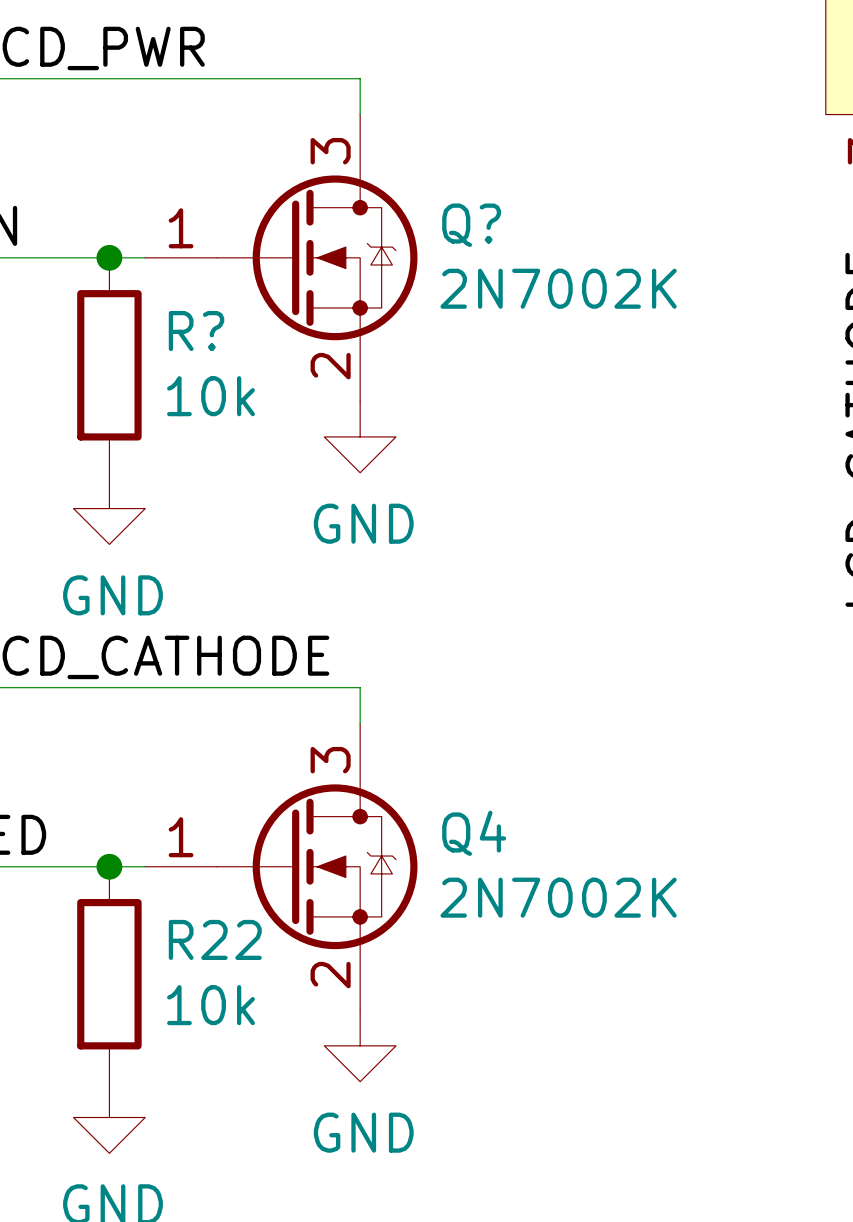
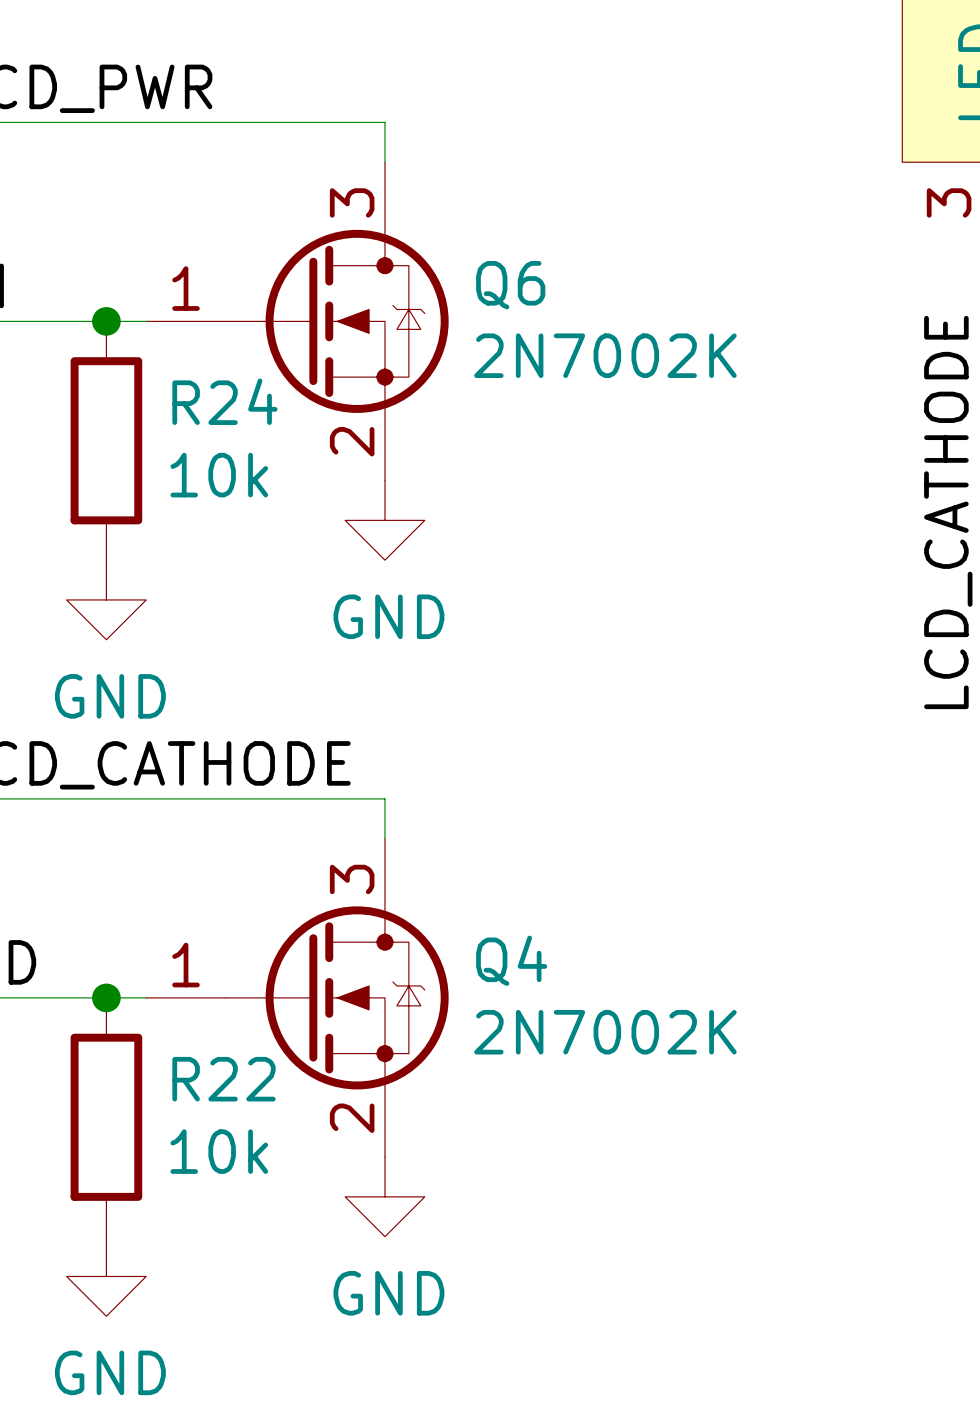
Q? name: Q? (471, 225) -> Q6 (510, 285)
R? name: R? (196, 331) -> R24 (224, 401)

